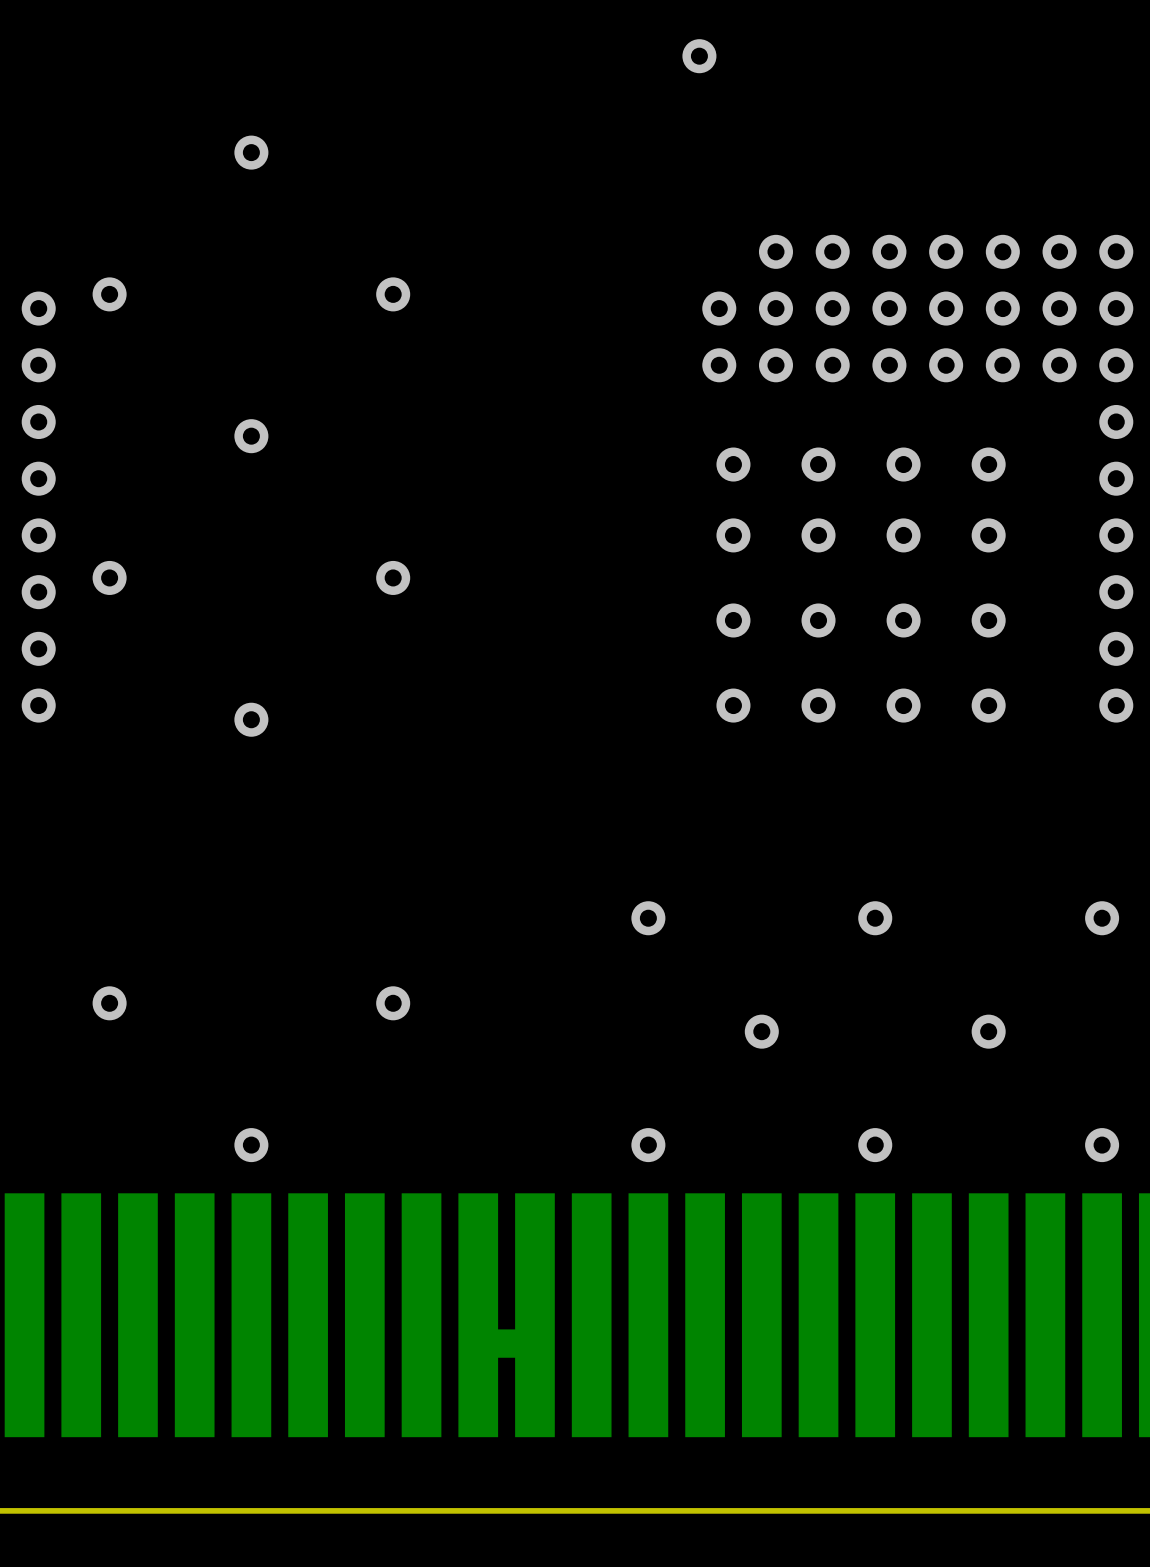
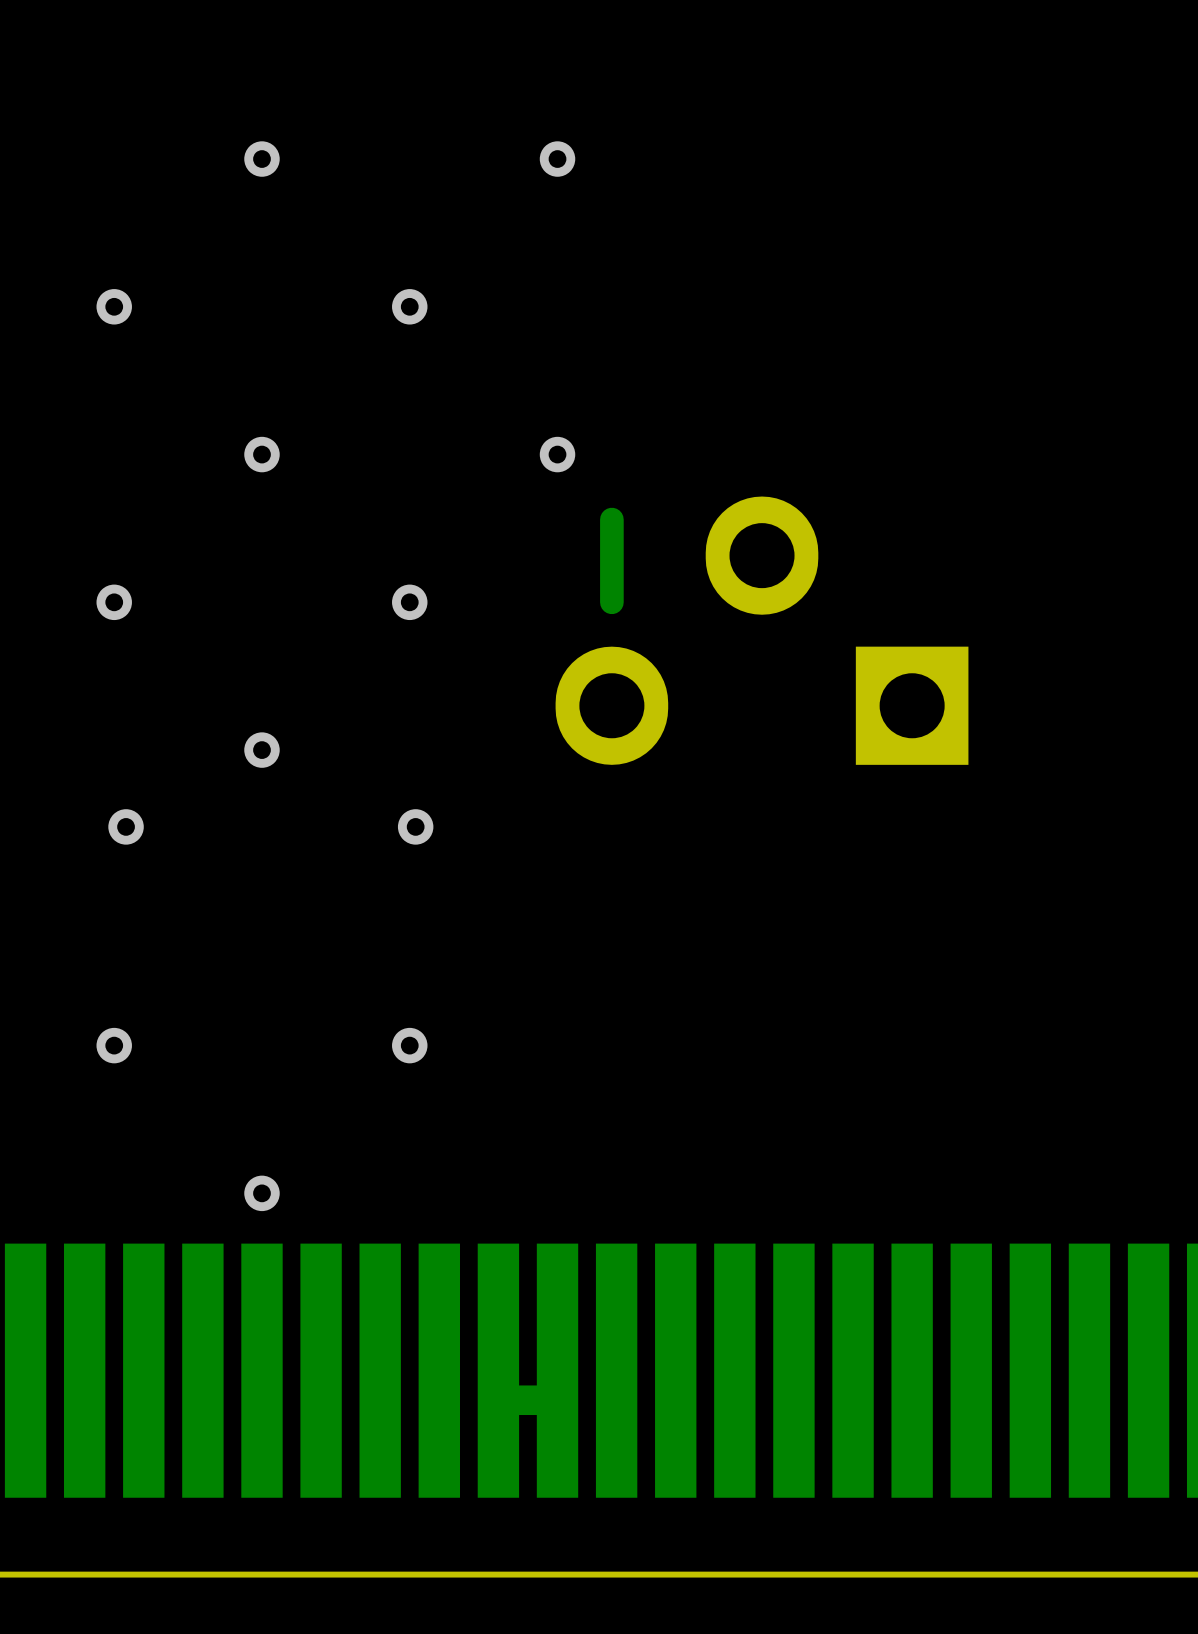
via: (699, 56) -> none
via: none -> (557, 159)
via: (775, 251) -> none
via: (832, 251) -> none
via: (889, 251) -> none
via: (946, 251) -> none
via: (1002, 251) -> none
via: (1059, 251) -> none
via: (1116, 251) -> none
via: (38, 308) -> none
via: (719, 308) -> none
via: (775, 308) -> none
via: (832, 308) -> none
via: (889, 308) -> none
via: (946, 308) -> none
via: (1002, 308) -> none
via: (1059, 308) -> none
via: (1116, 308) -> none
via: (38, 365) -> none
via: (719, 365) -> none
via: (775, 365) -> none
via: (832, 365) -> none
via: (889, 365) -> none
via: (946, 365) -> none
via: (1002, 365) -> none
via: (1059, 365) -> none
via: (1116, 365) -> none
via: (38, 421) -> none
via: (1116, 421) -> none
via: none -> (557, 454)
via: (733, 464) -> none
via: (818, 464) -> none
via: (903, 464) -> none
via: (988, 464) -> none
via: (38, 478) -> none
via: (1116, 478) -> none
track: none -> (611, 519) (611, 602)
via: (38, 535) -> none
via: (733, 535) -> none
via: (818, 535) -> none
via: (903, 535) -> none
via: (988, 535) -> none
via: (1116, 535) -> none
via: (38, 592) -> none
via: (1116, 592) -> none
part: none -> (762, 630)
via: (733, 620) -> none
via: (818, 620) -> none
via: (903, 620) -> none
via: (988, 620) -> none
via: (38, 648) -> none
via: (1116, 648) -> none
via: (38, 705) -> none
via: (733, 705) -> none
via: (818, 705) -> none
via: (903, 705) -> none
via: (988, 705) -> none
via: (1116, 705) -> none
via: none -> (126, 826)
via: none -> (415, 826)
via: (648, 918) -> none
via: (875, 918) -> none
via: (1102, 918) -> none
via: (761, 1031) -> none
via: (988, 1031) -> none
via: (648, 1145) -> none
via: (875, 1145) -> none
via: (1102, 1145) -> none

